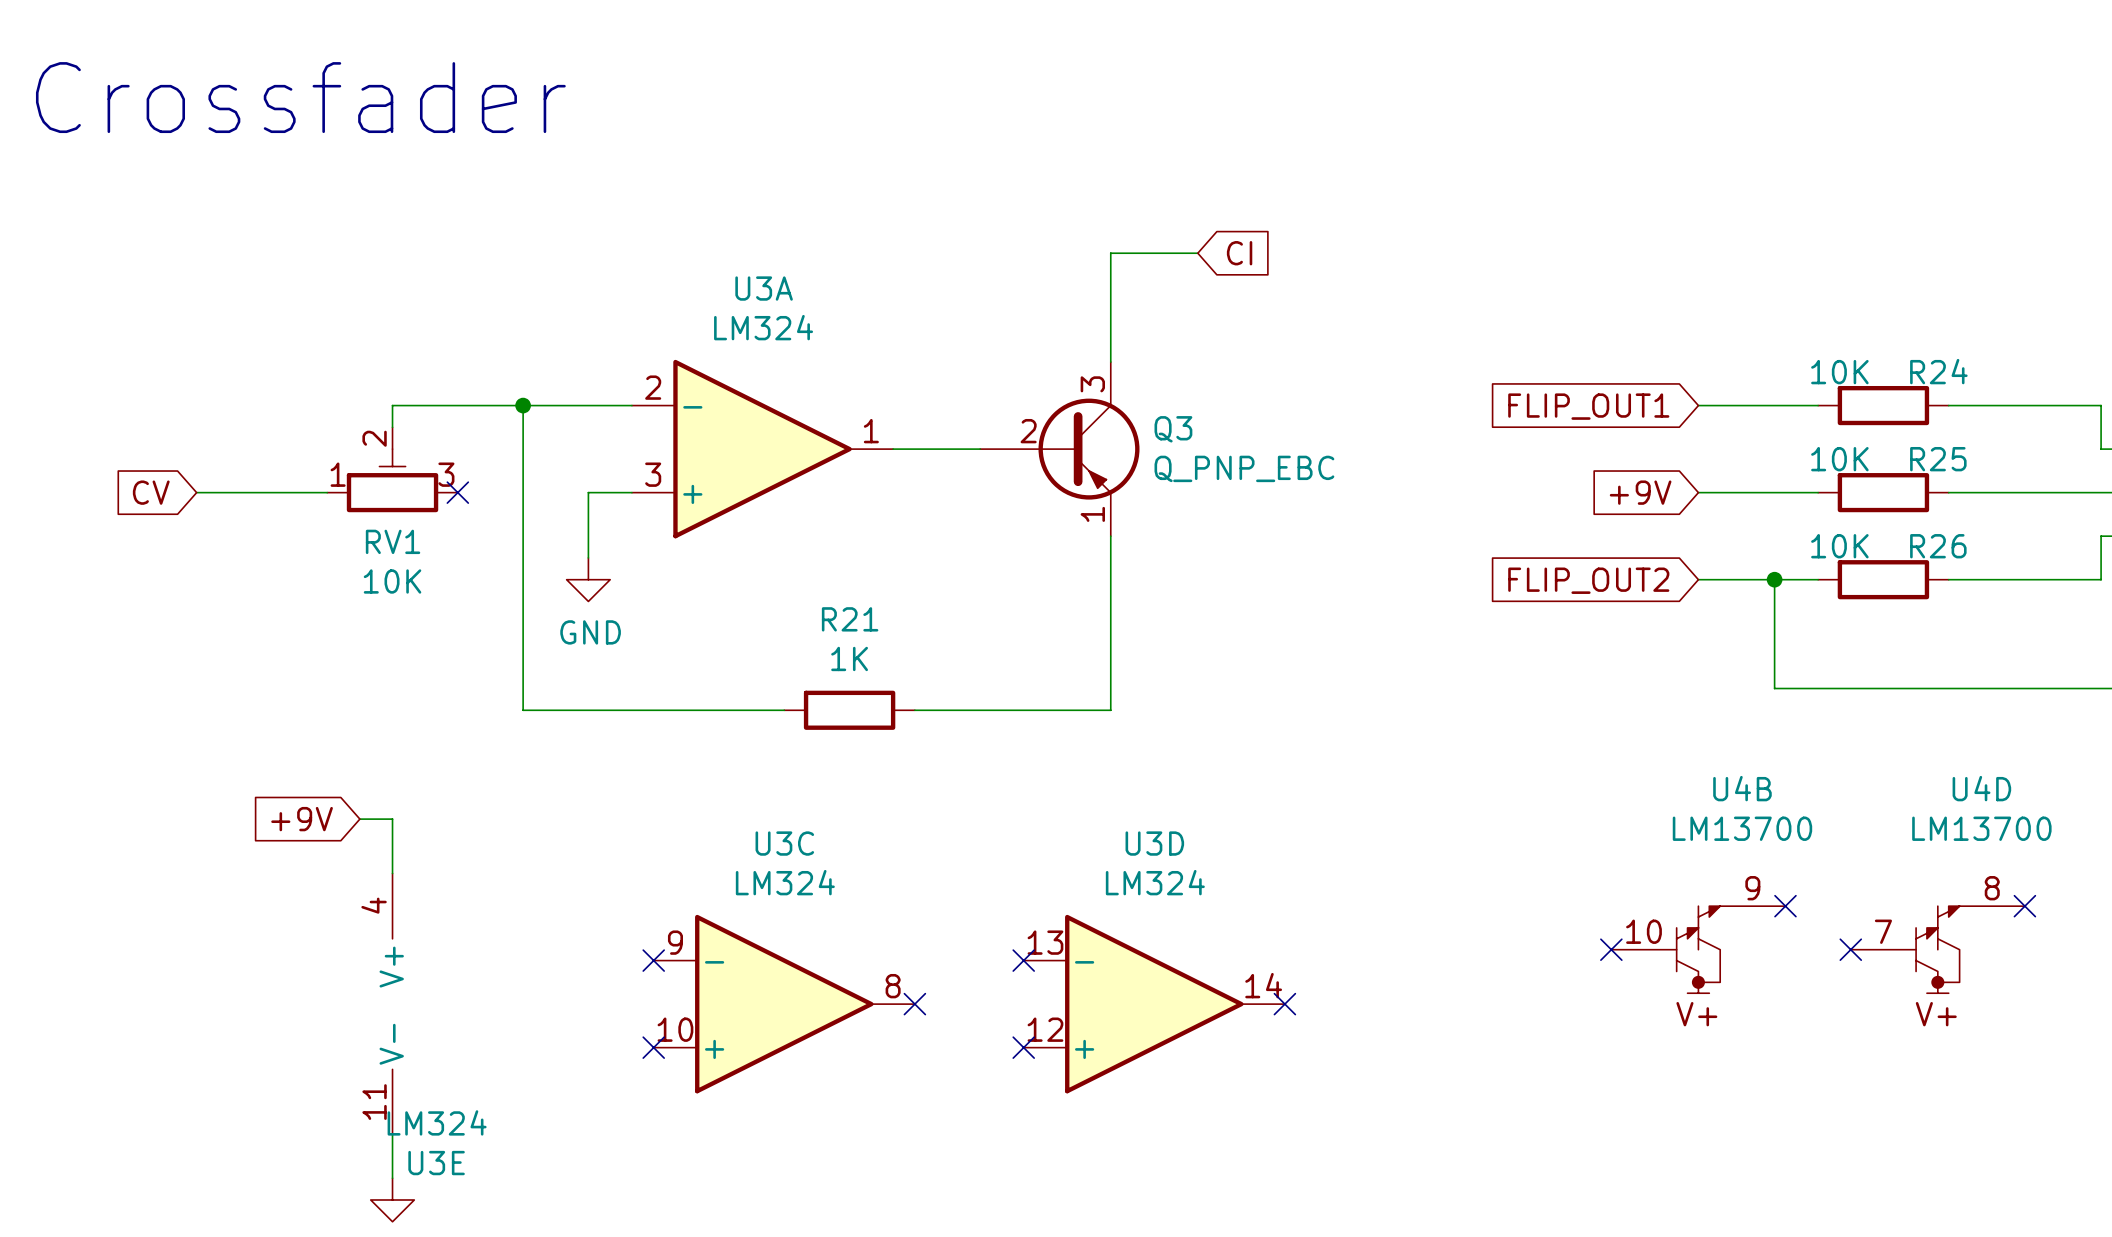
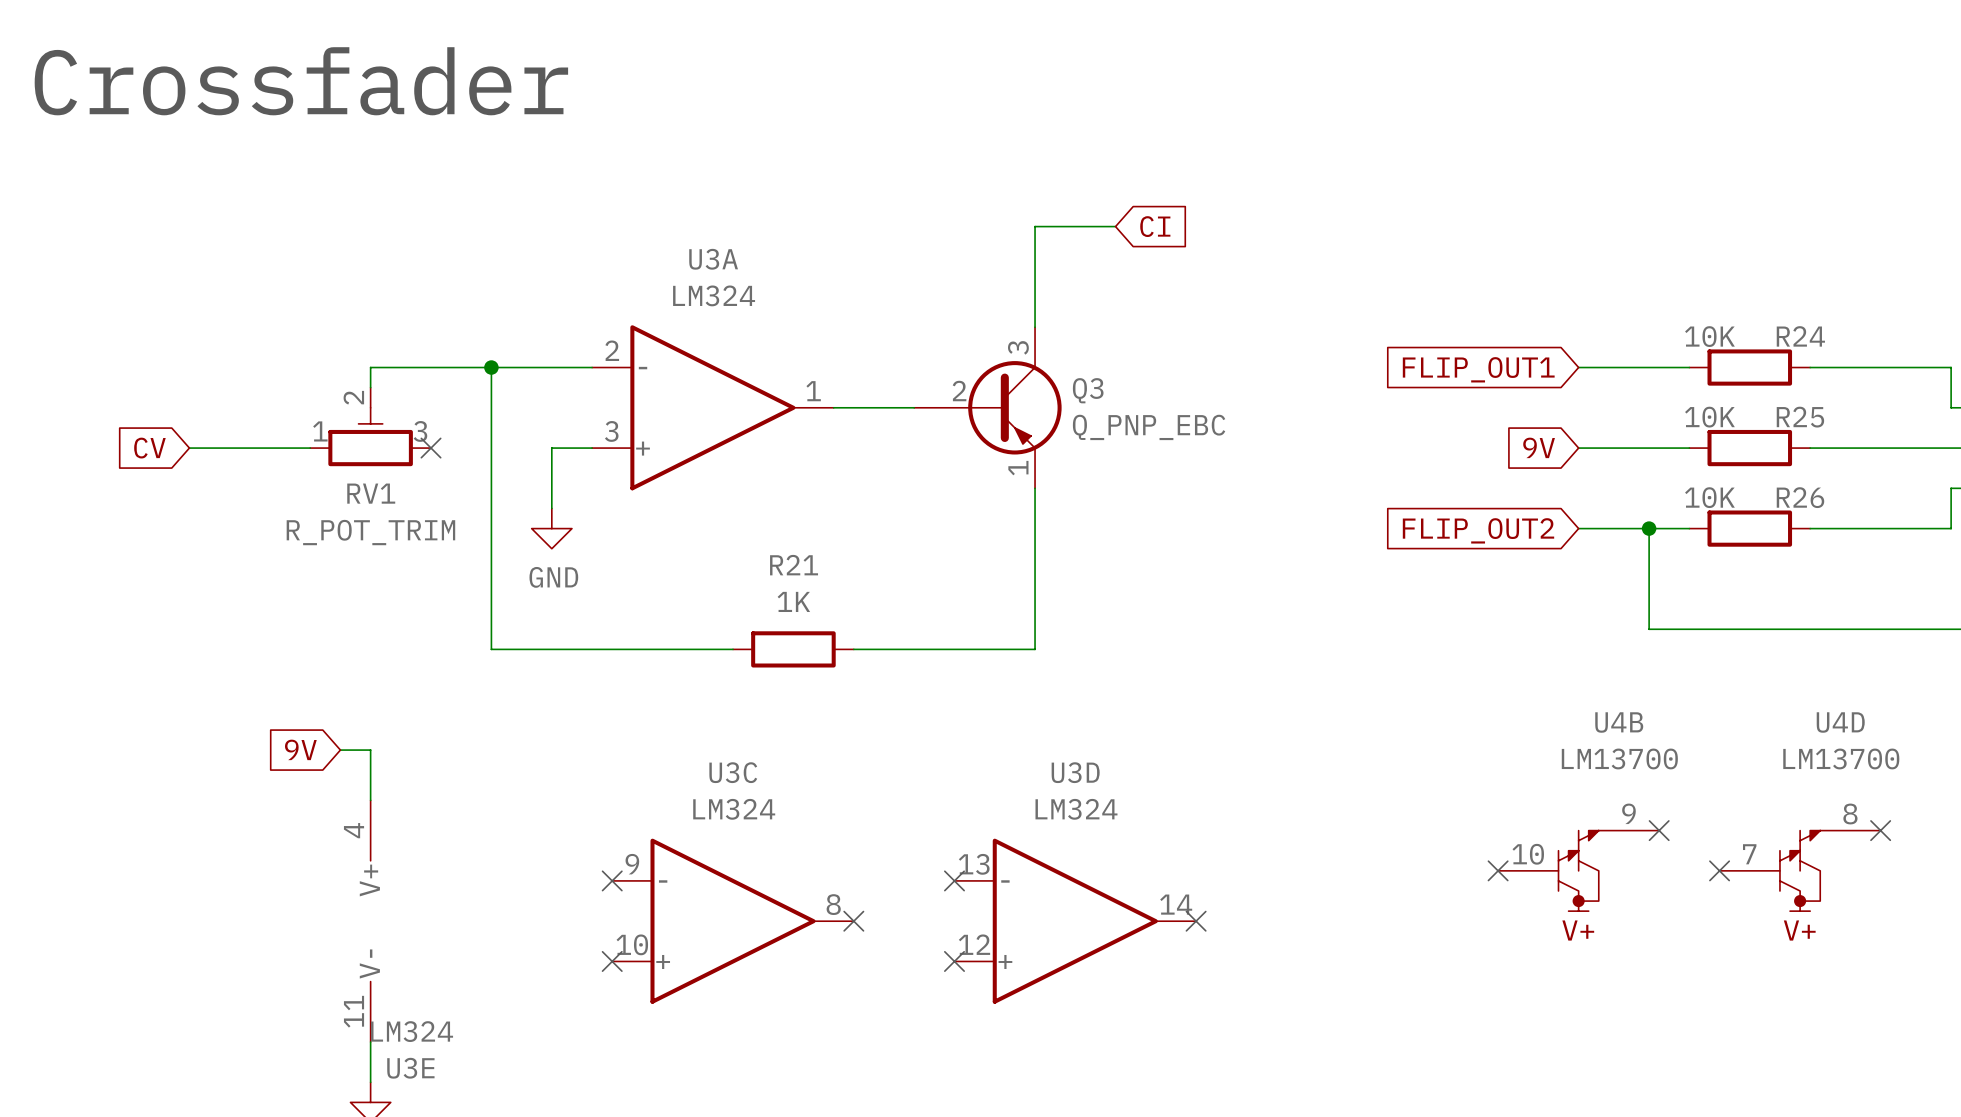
global label: +9V (1640, 492) -> 9V (1539, 447)
RV1 value: 10K (392, 581) -> R_POT_TRIM (370, 532)
global label: +9V (302, 819) -> 9V (300, 749)

